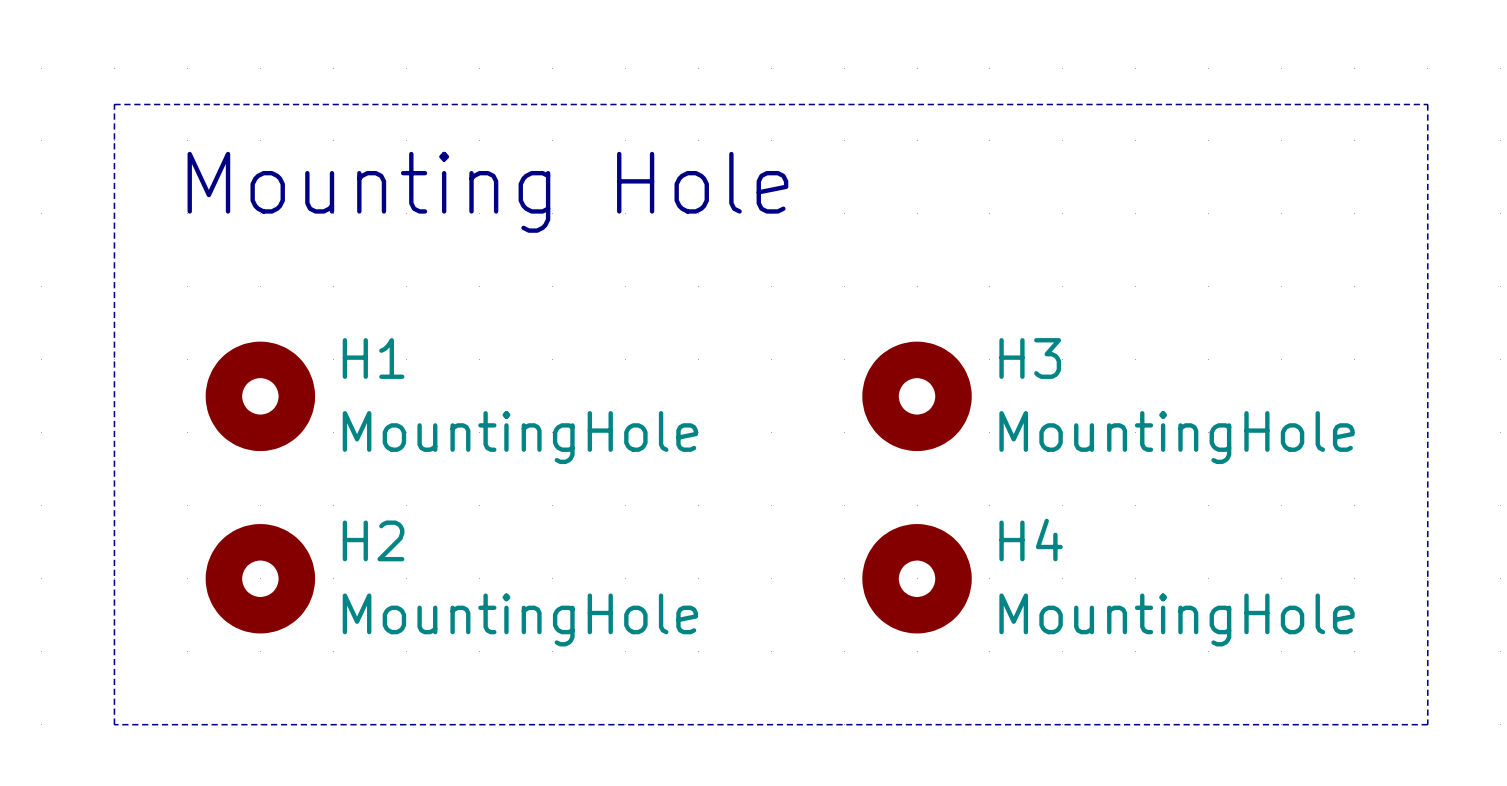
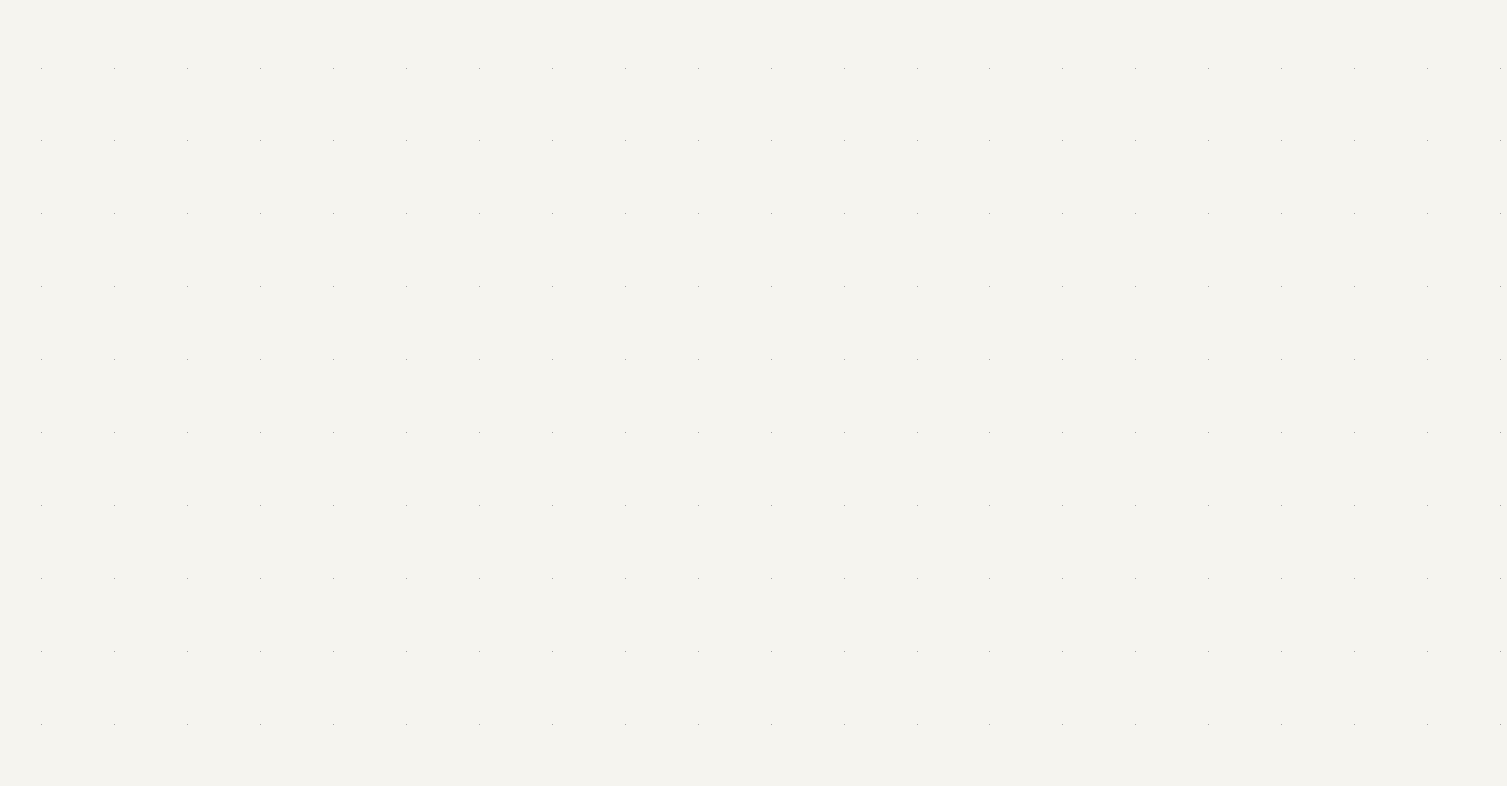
line: (114, 104) (1427, 104) (1427, 724) (114, 724) (114, 104) -> none
text: Mounting Hole (487, 192) -> none
H1: MountingHole (260, 396) -> none
H3: MountingHole (917, 396) -> none
H2: MountingHole (260, 578) -> none
H4: MountingHole (917, 578) -> none

